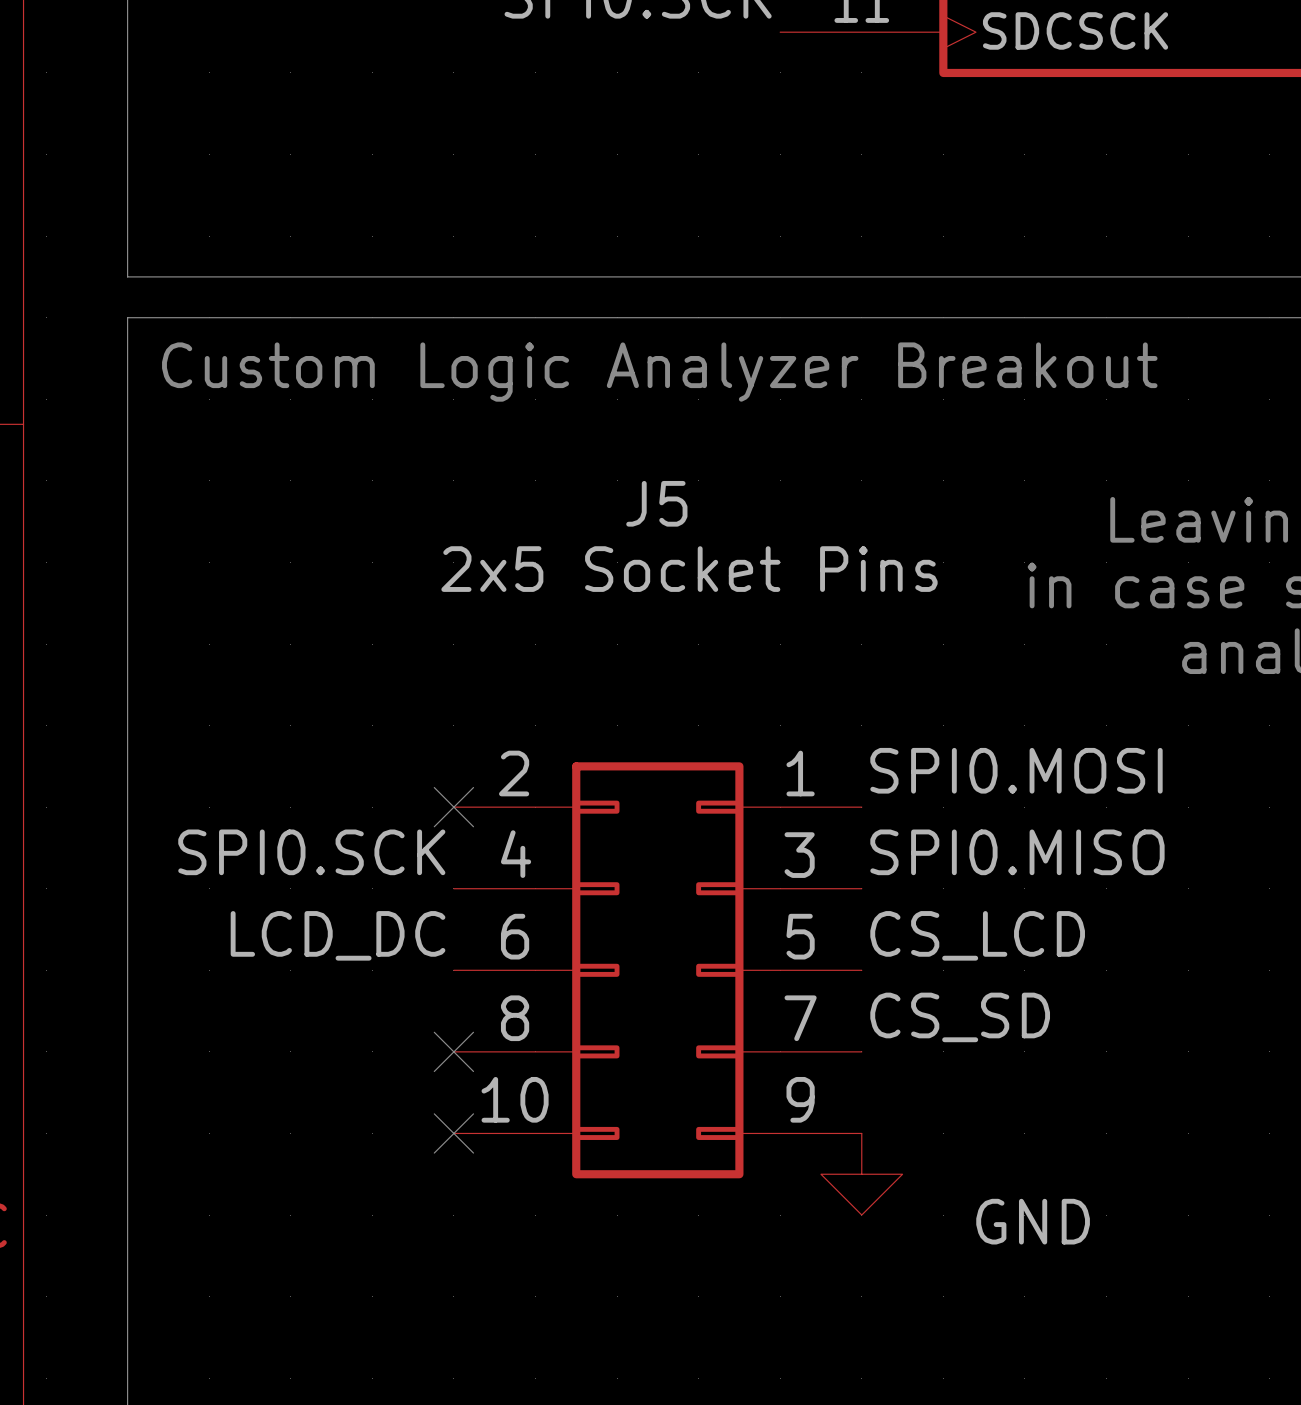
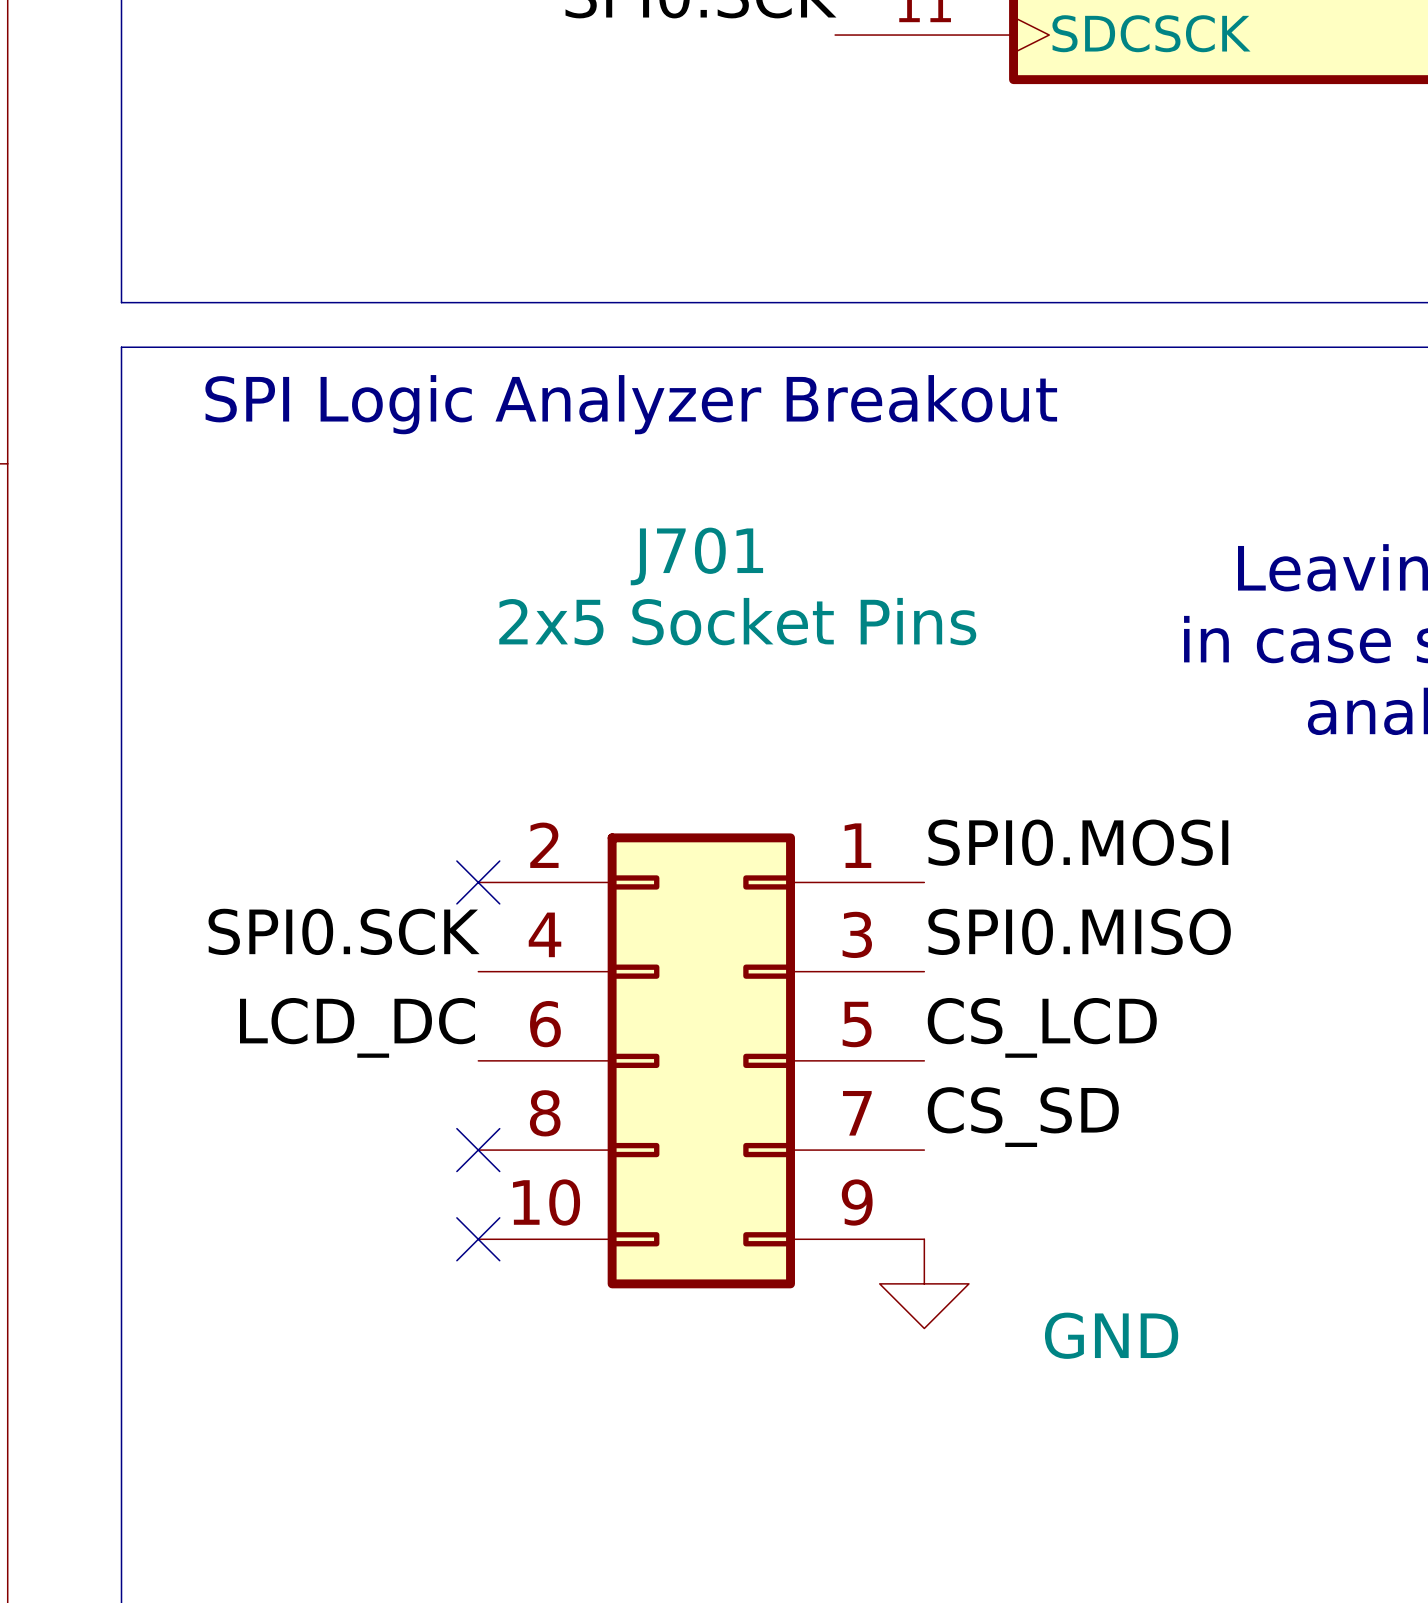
text: Custom Logic Analyzer Breakout (659, 372) -> SPI Logic Analyzer Breakout (631, 404)
J5 name: J5 (656, 503) -> J701 (696, 556)

